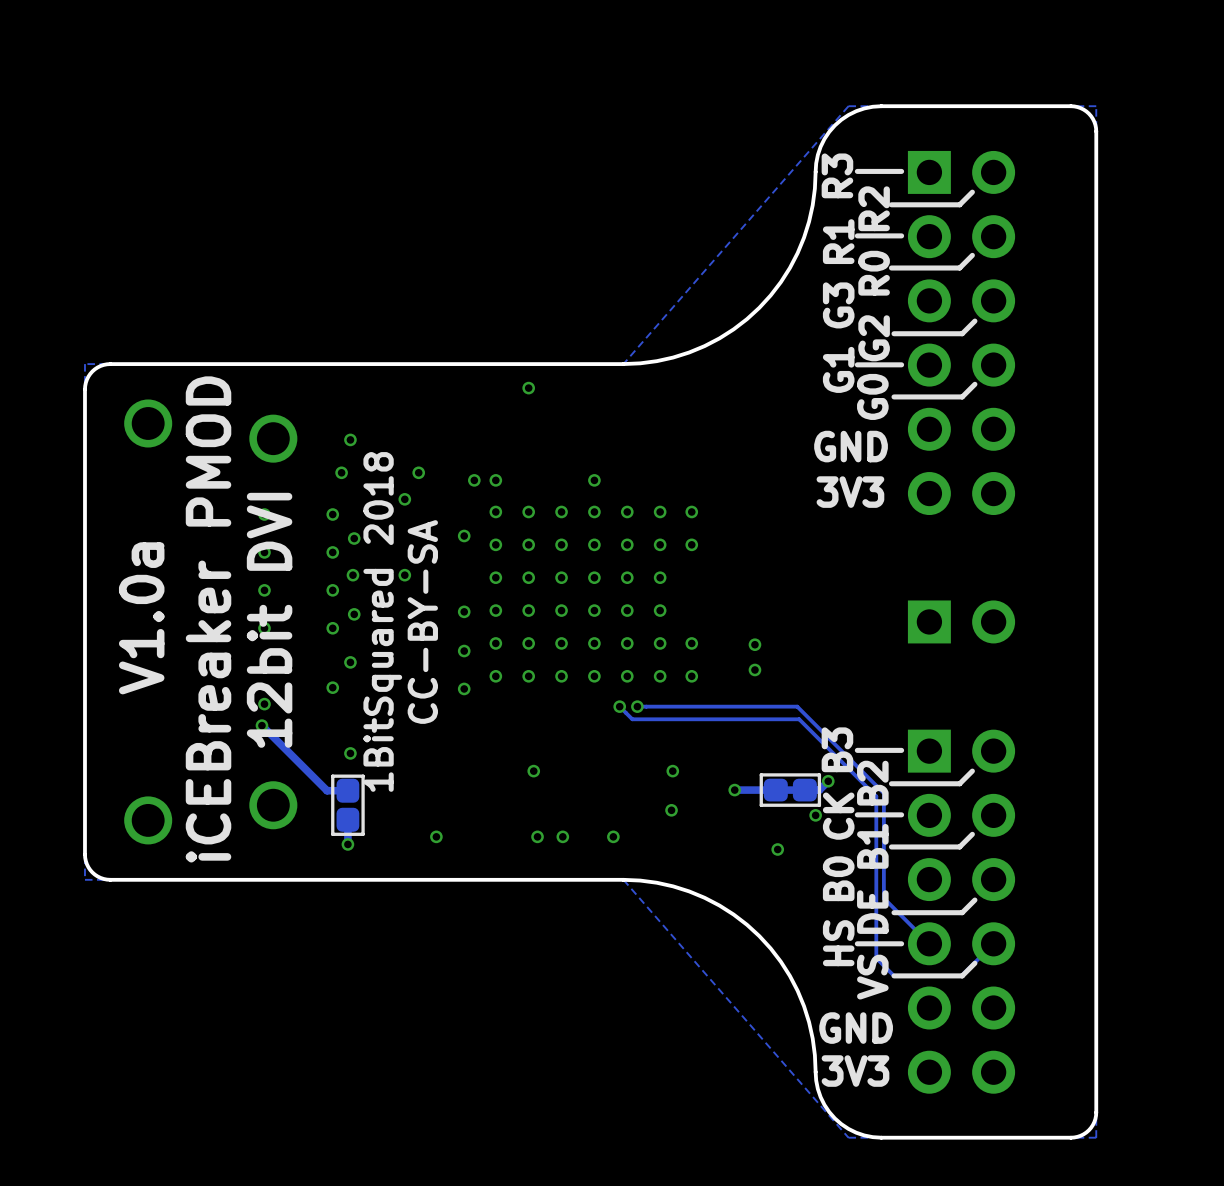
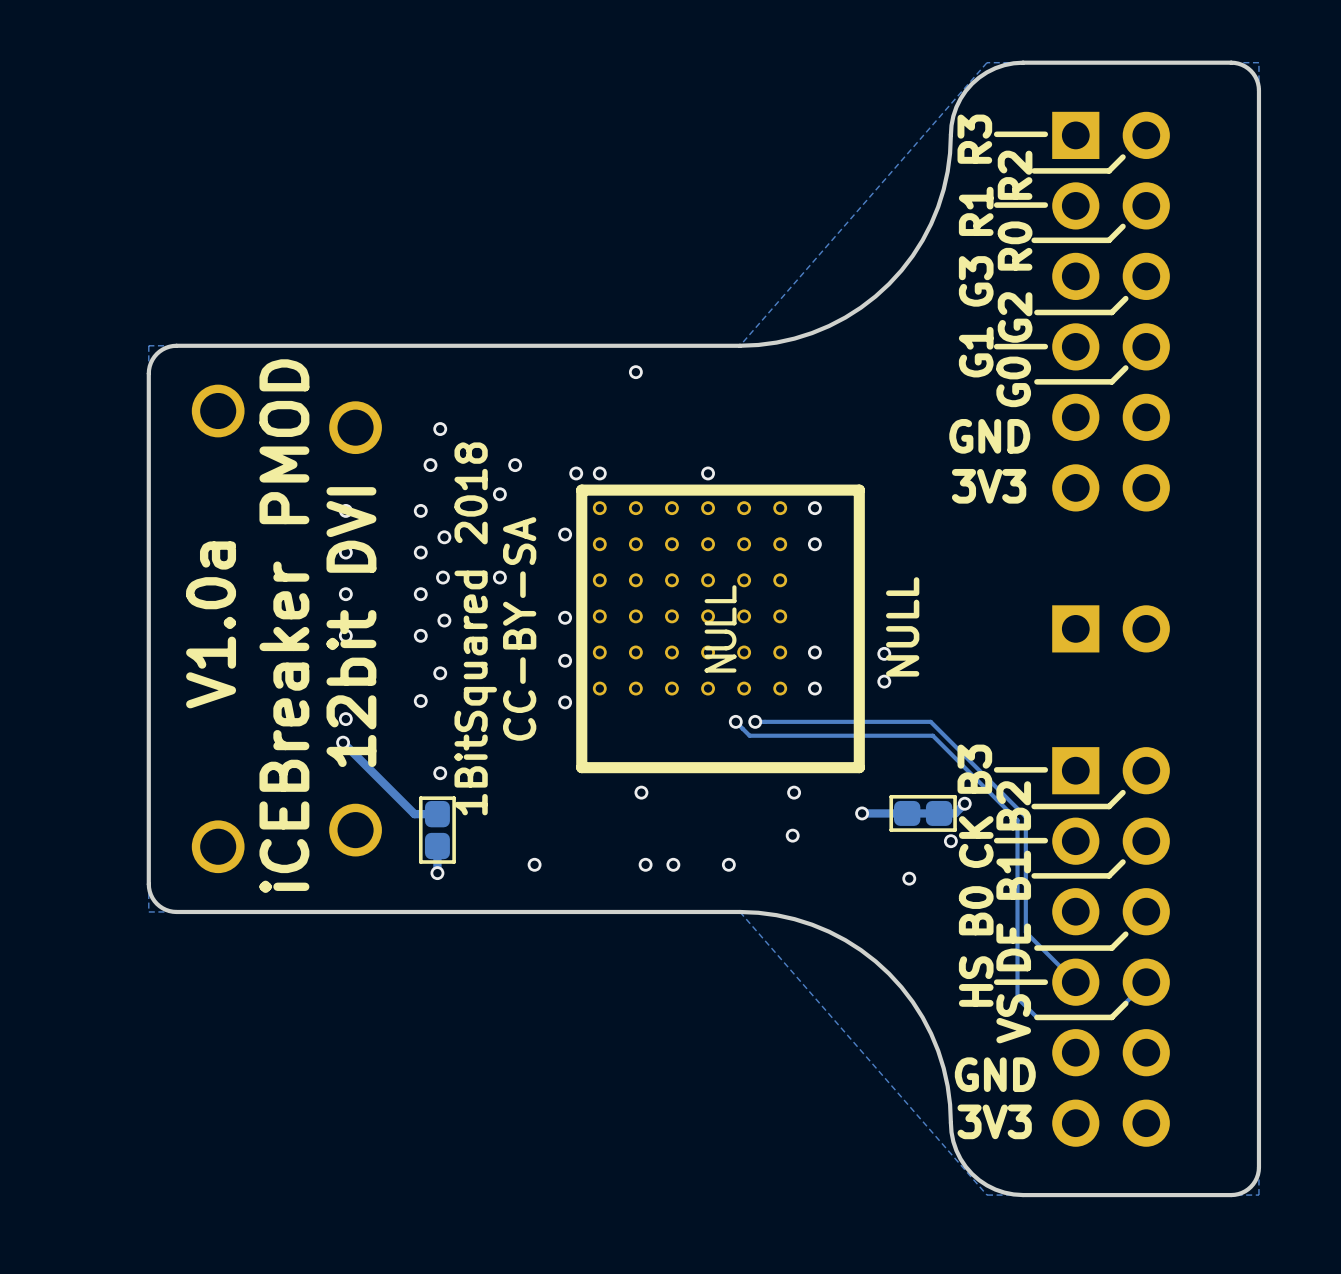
drawing: none -> [576, 484, 865, 774]
text: none -> NULL (902, 626)

